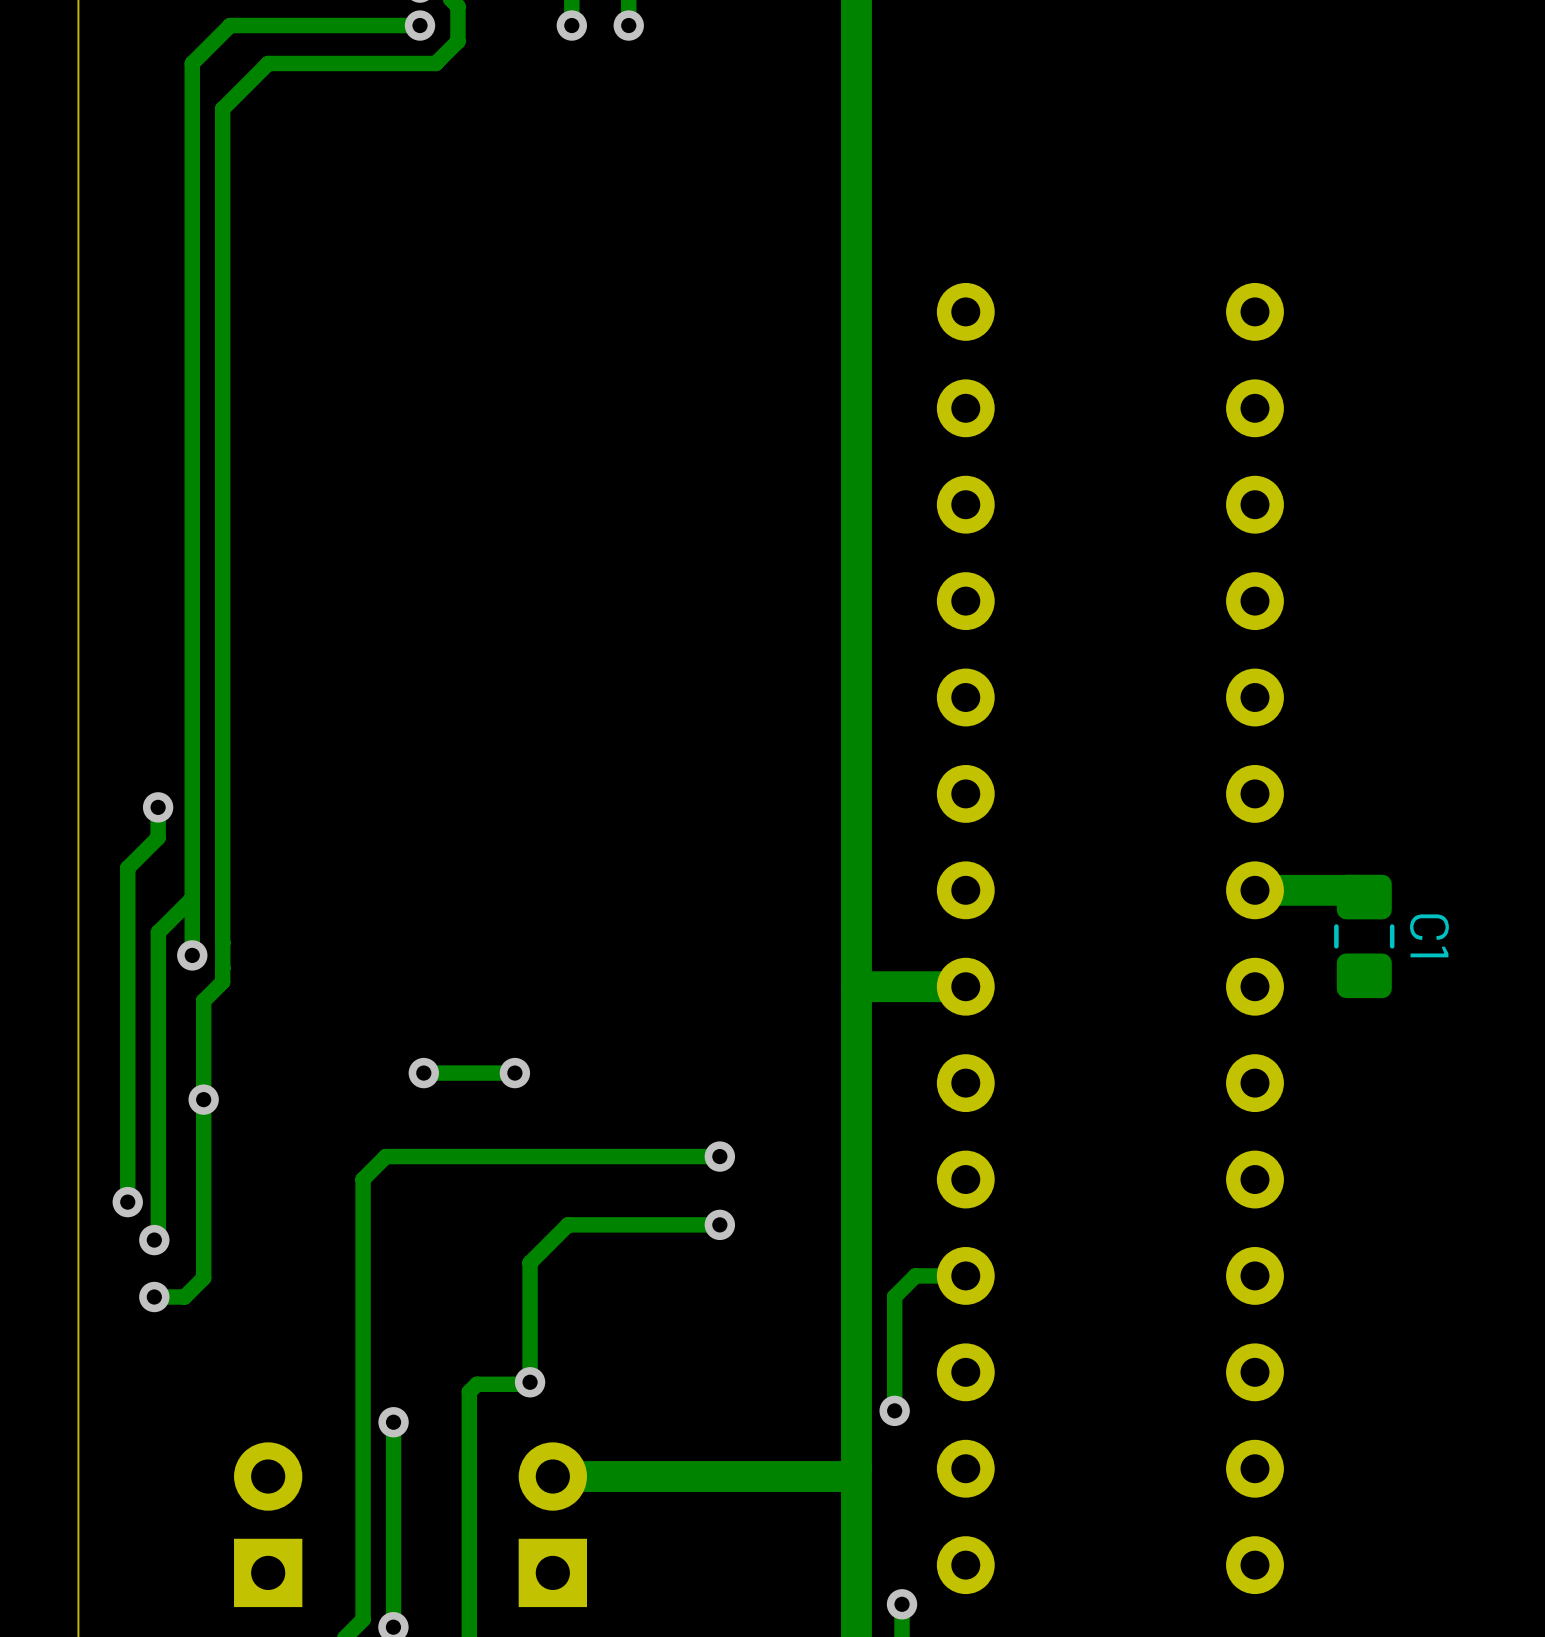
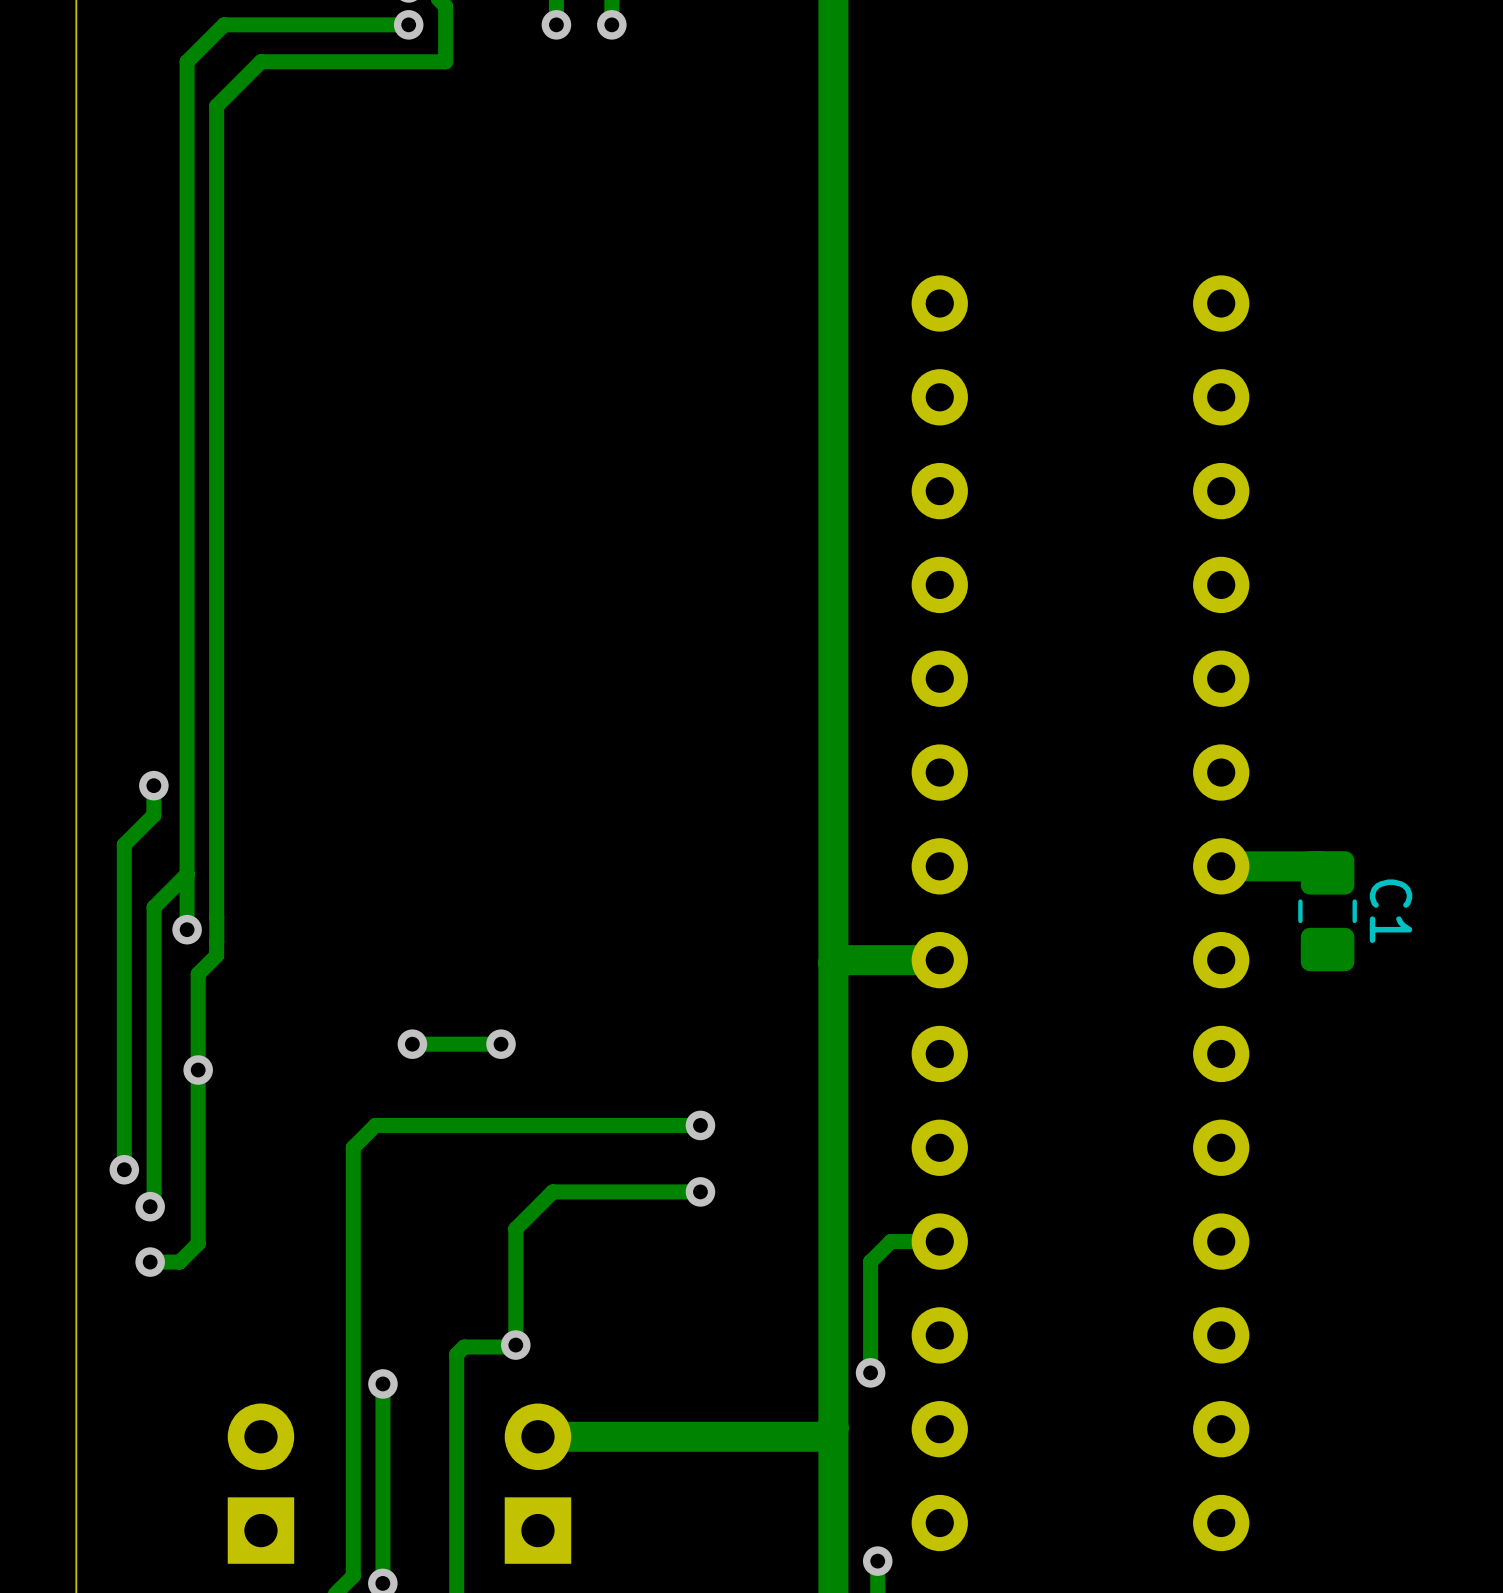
track: (457, 41) (435, 63) -> (445, 40) (445, 61) (424, 61)

